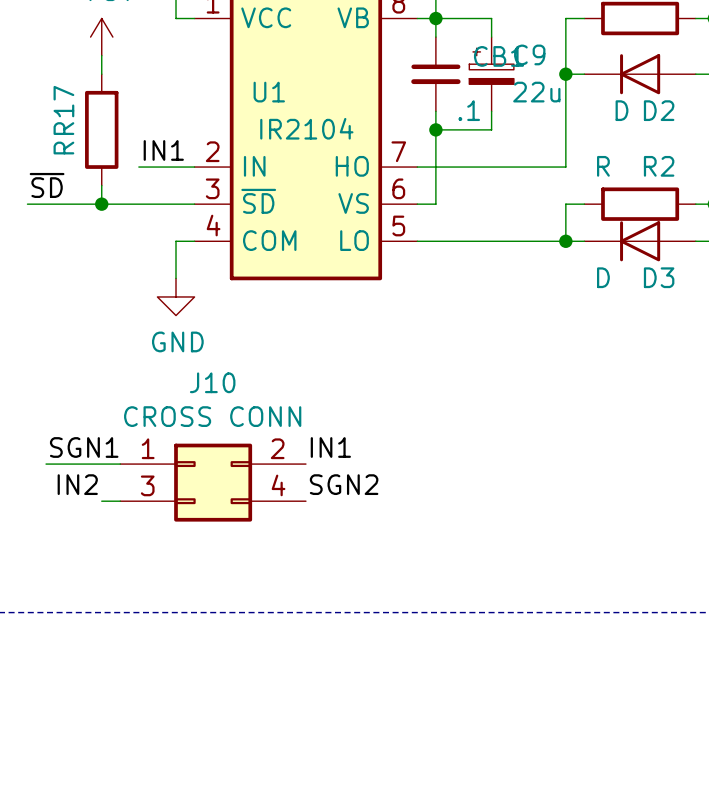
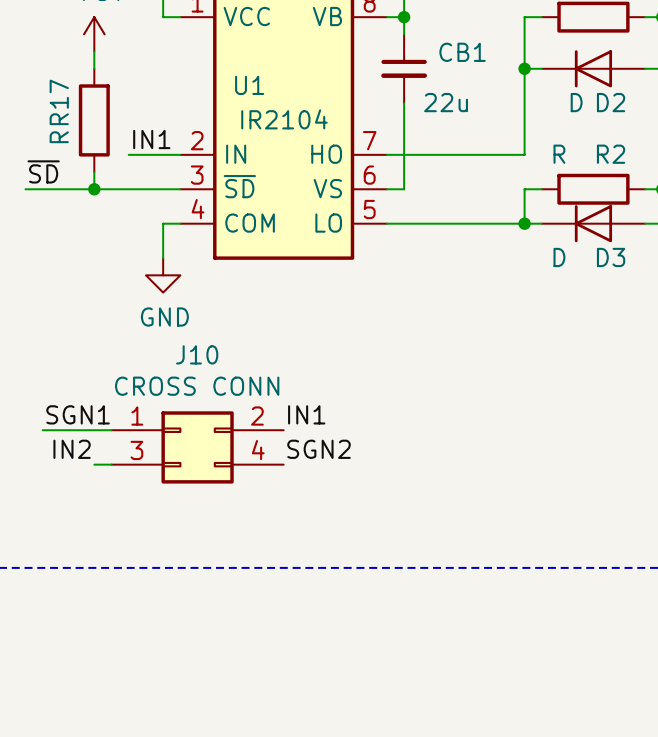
wire: (435, 18) (491, 18) (491, 37) -> none
C9: 22u (491, 74) -> none
CB1 value: .1 (469, 110) -> 22u (446, 102)
wire: (491, 111) (491, 129) (435, 129) -> none
junction: (435, 129) -> none

